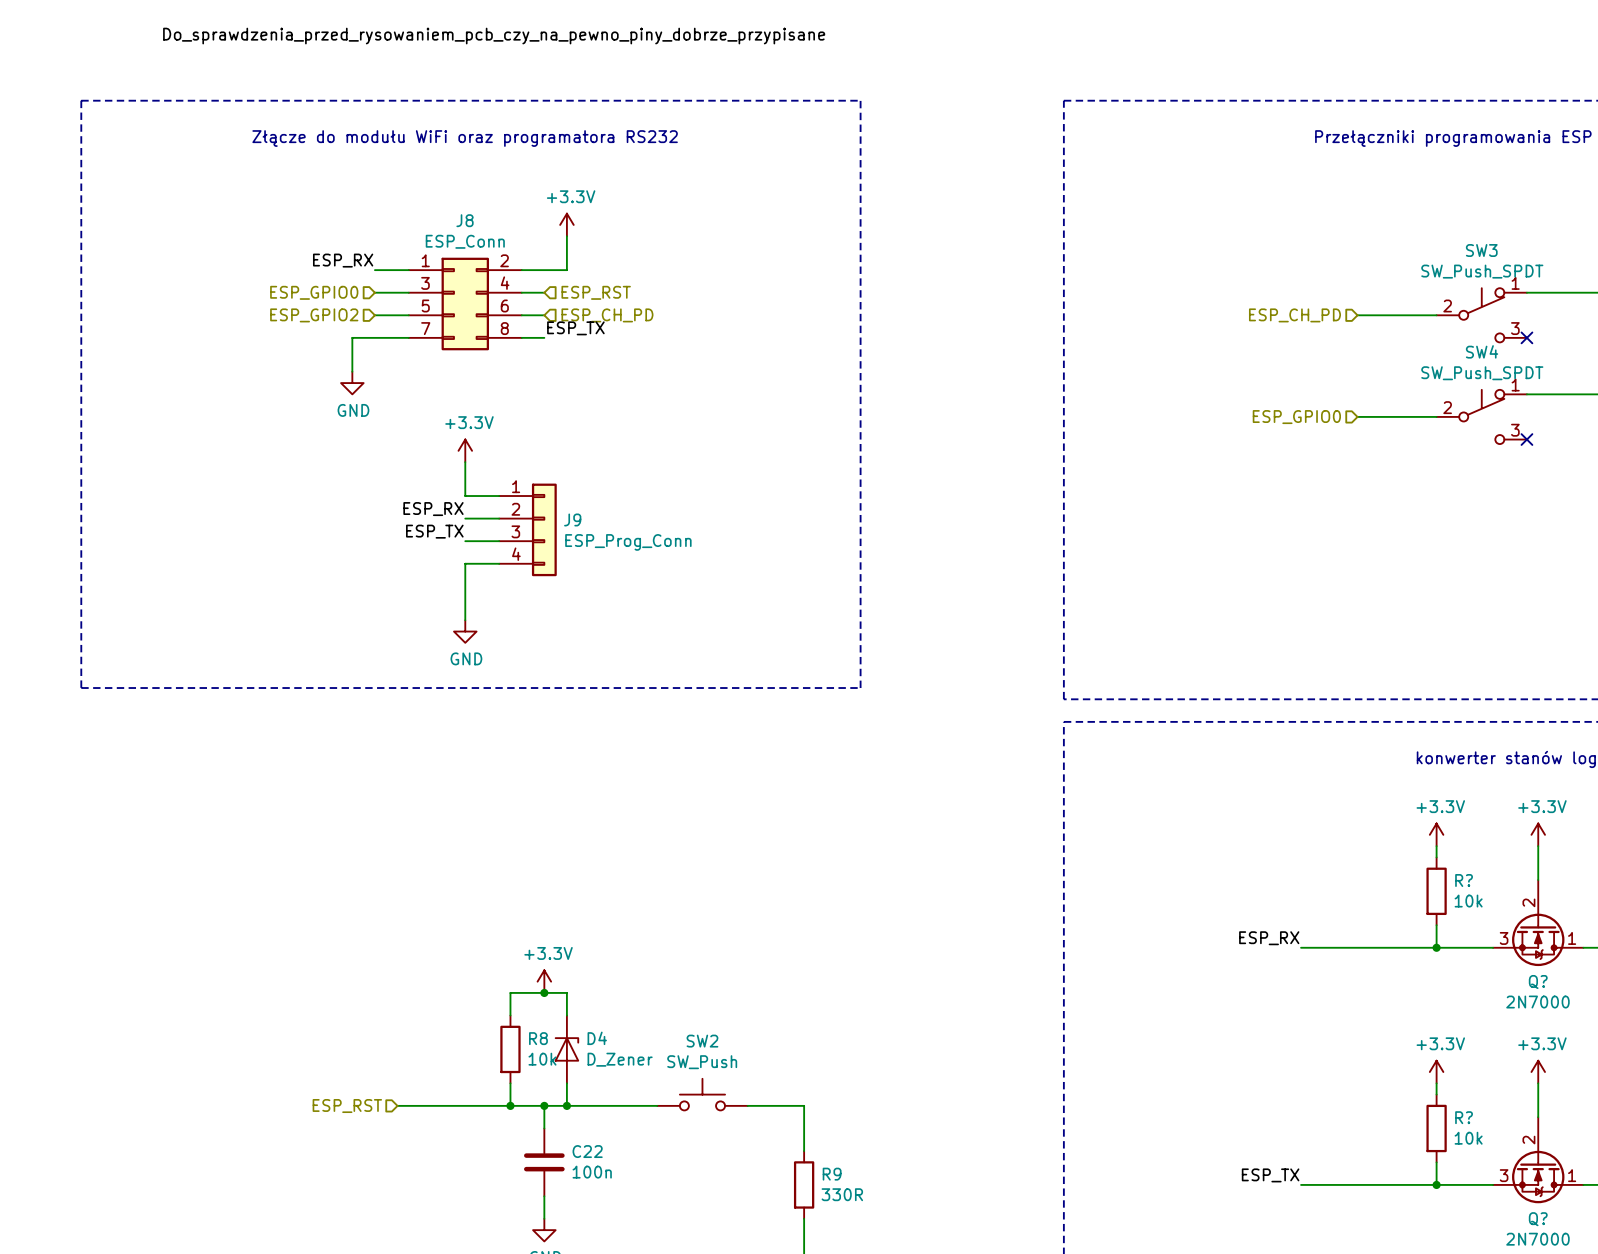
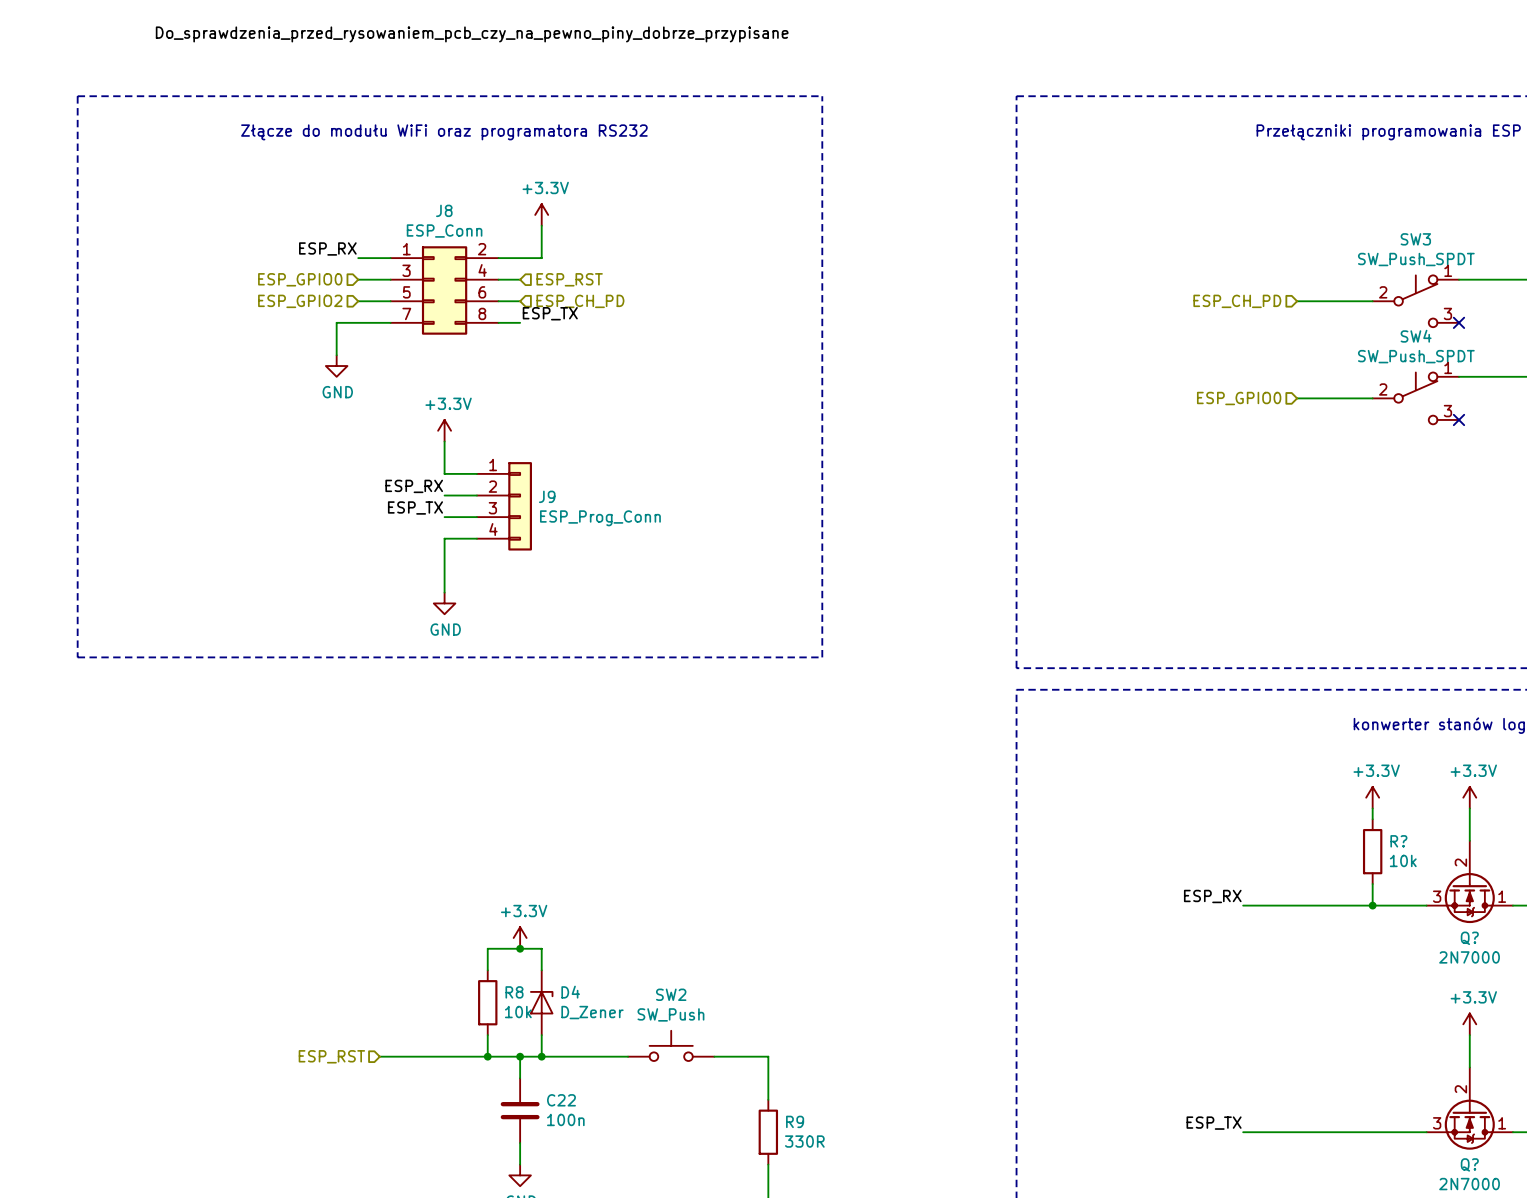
power symbol: +3.3V (1436, 1072) -> none
wire: (1436, 1083) (1436, 1094) -> none
R?: 10k (1436, 1128) -> none
wire: (1436, 1162) (1436, 1184) -> none
junction: (1436, 1184) -> none

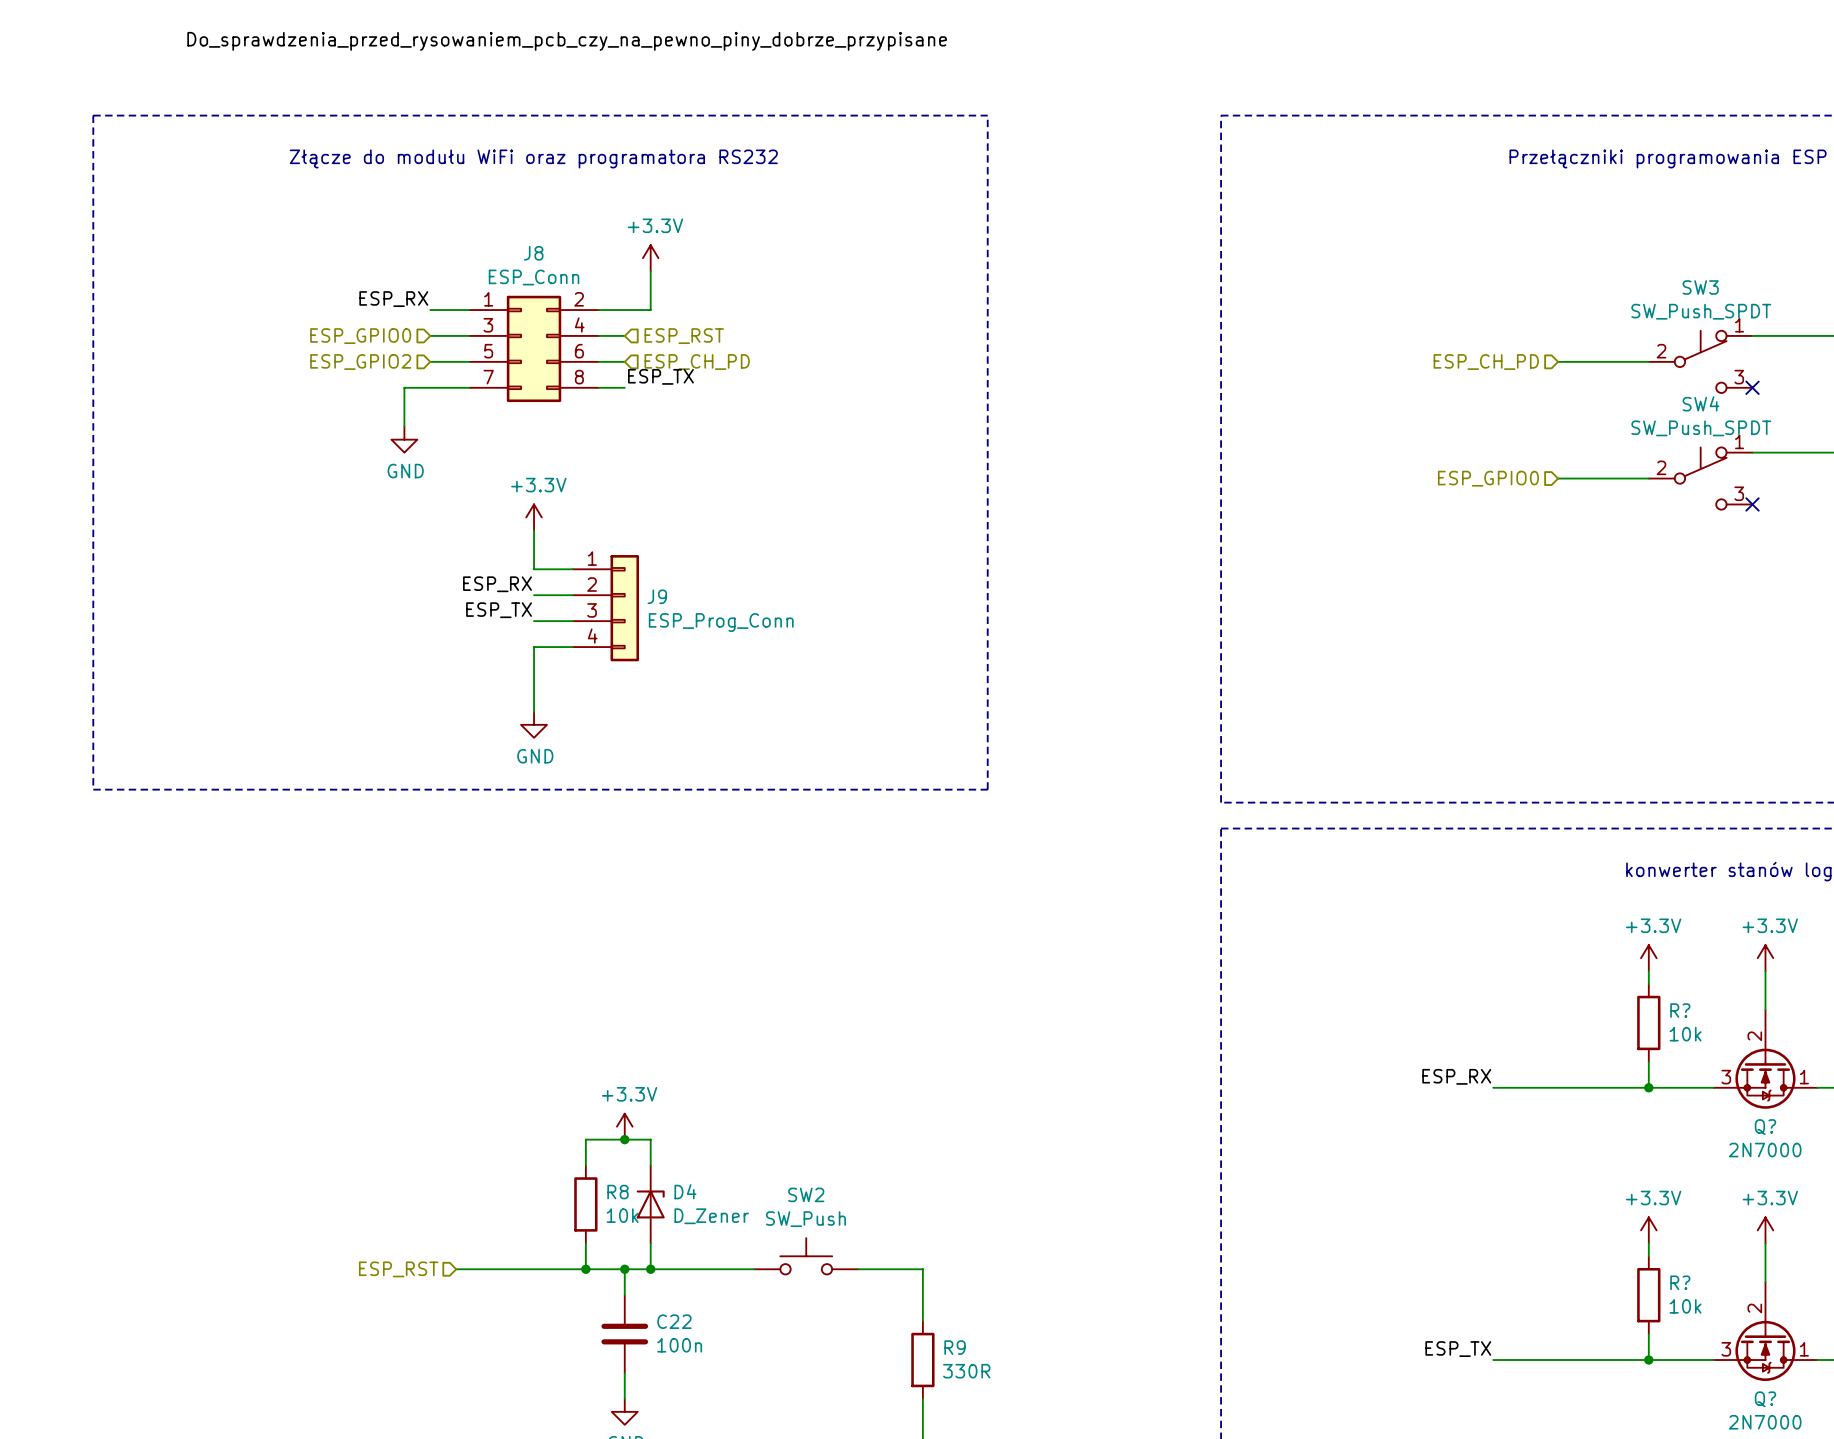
power symbol: none -> +3.3V (1648, 1230)
wire: none -> (1648, 1243) (1648, 1256)
R?: none -> 10k (1648, 1295)
wire: none -> (1648, 1334) (1648, 1360)
junction: none -> (1648, 1360)

